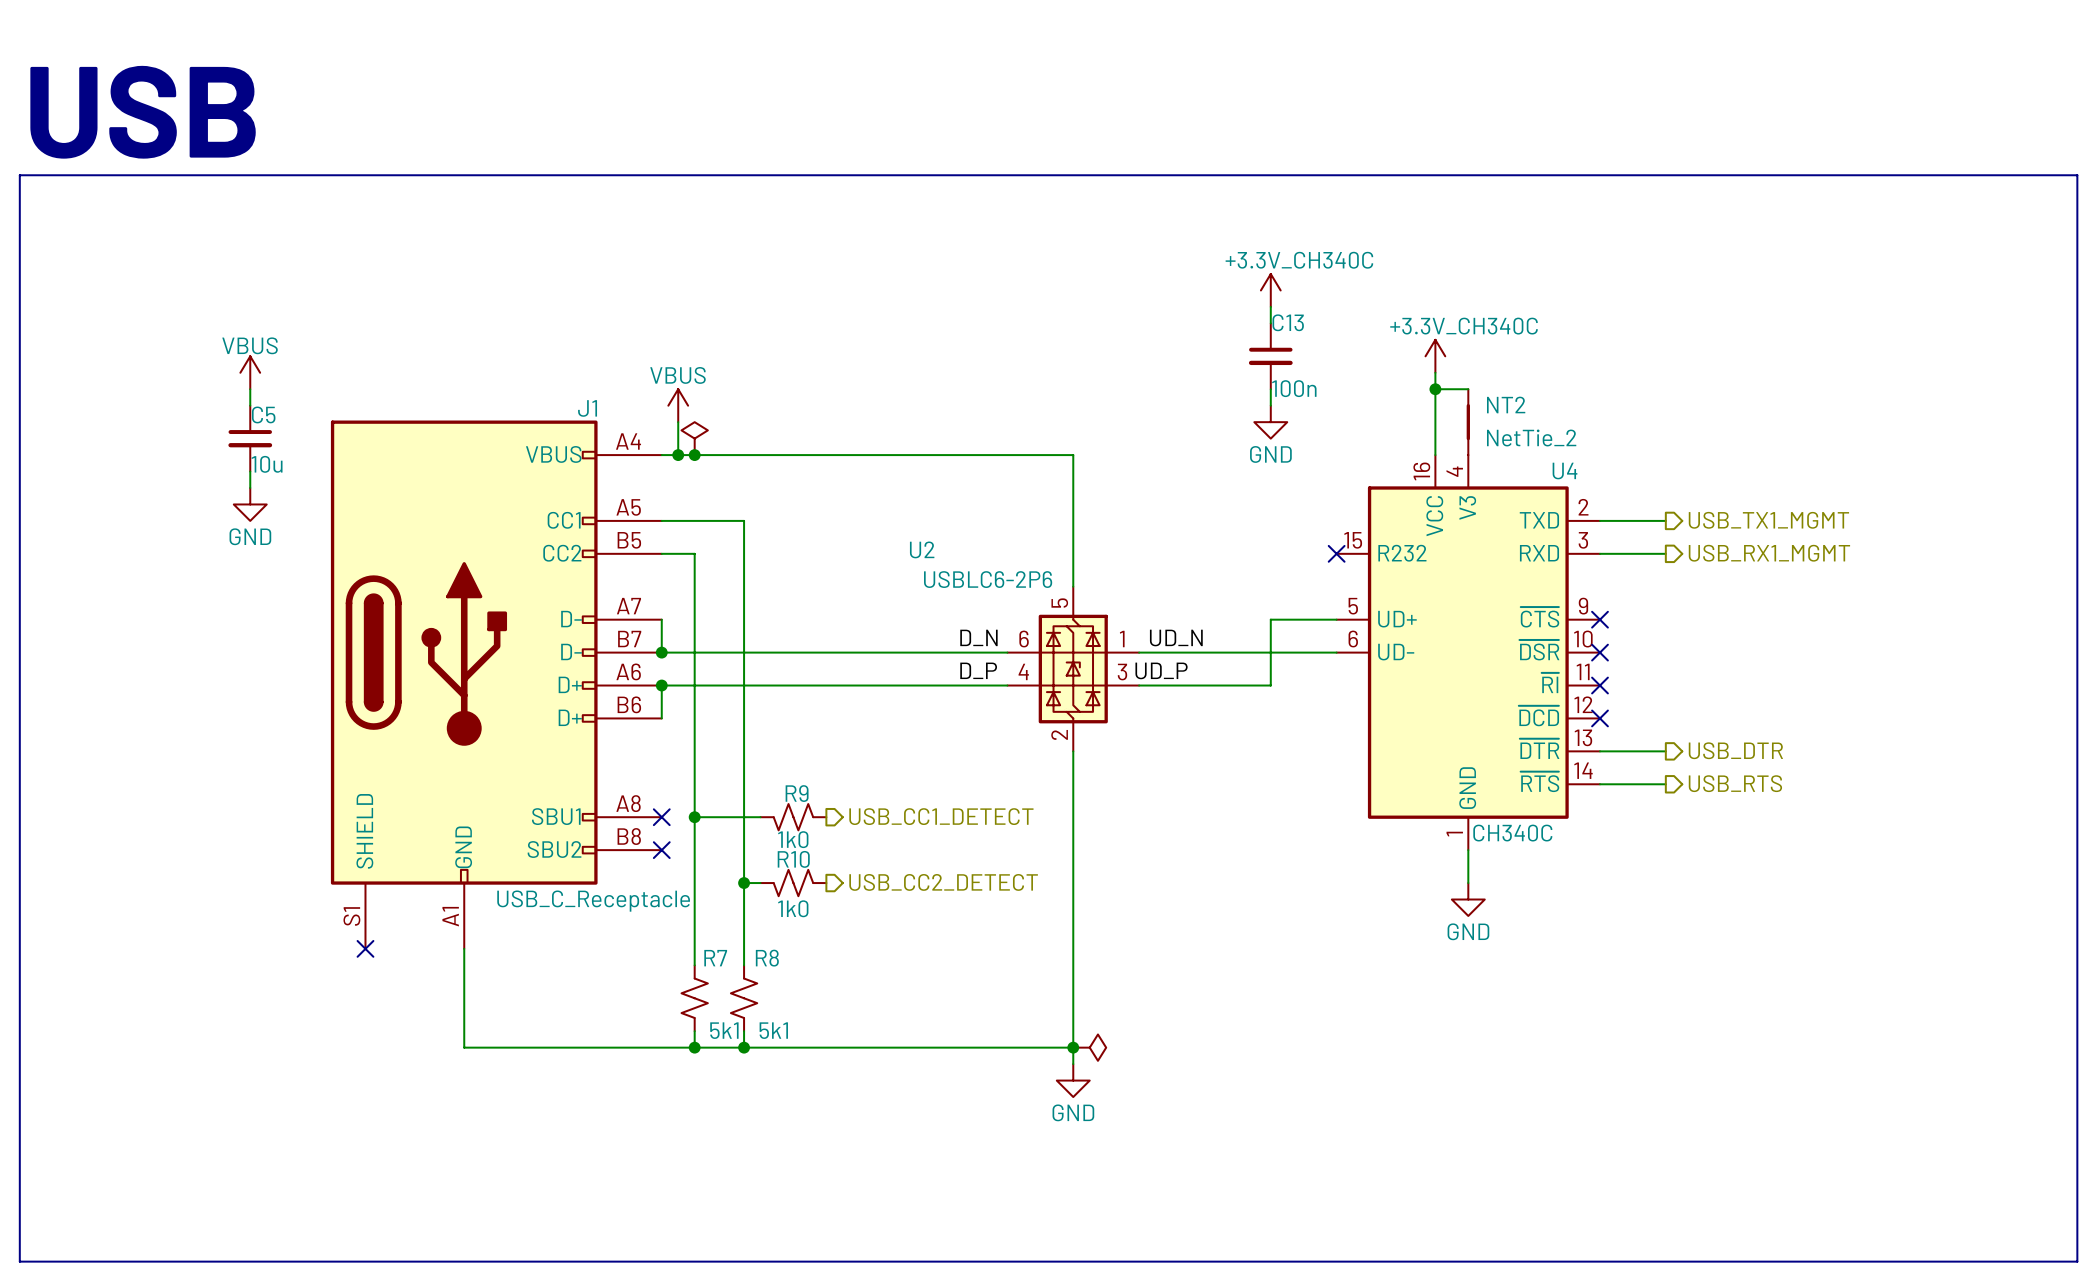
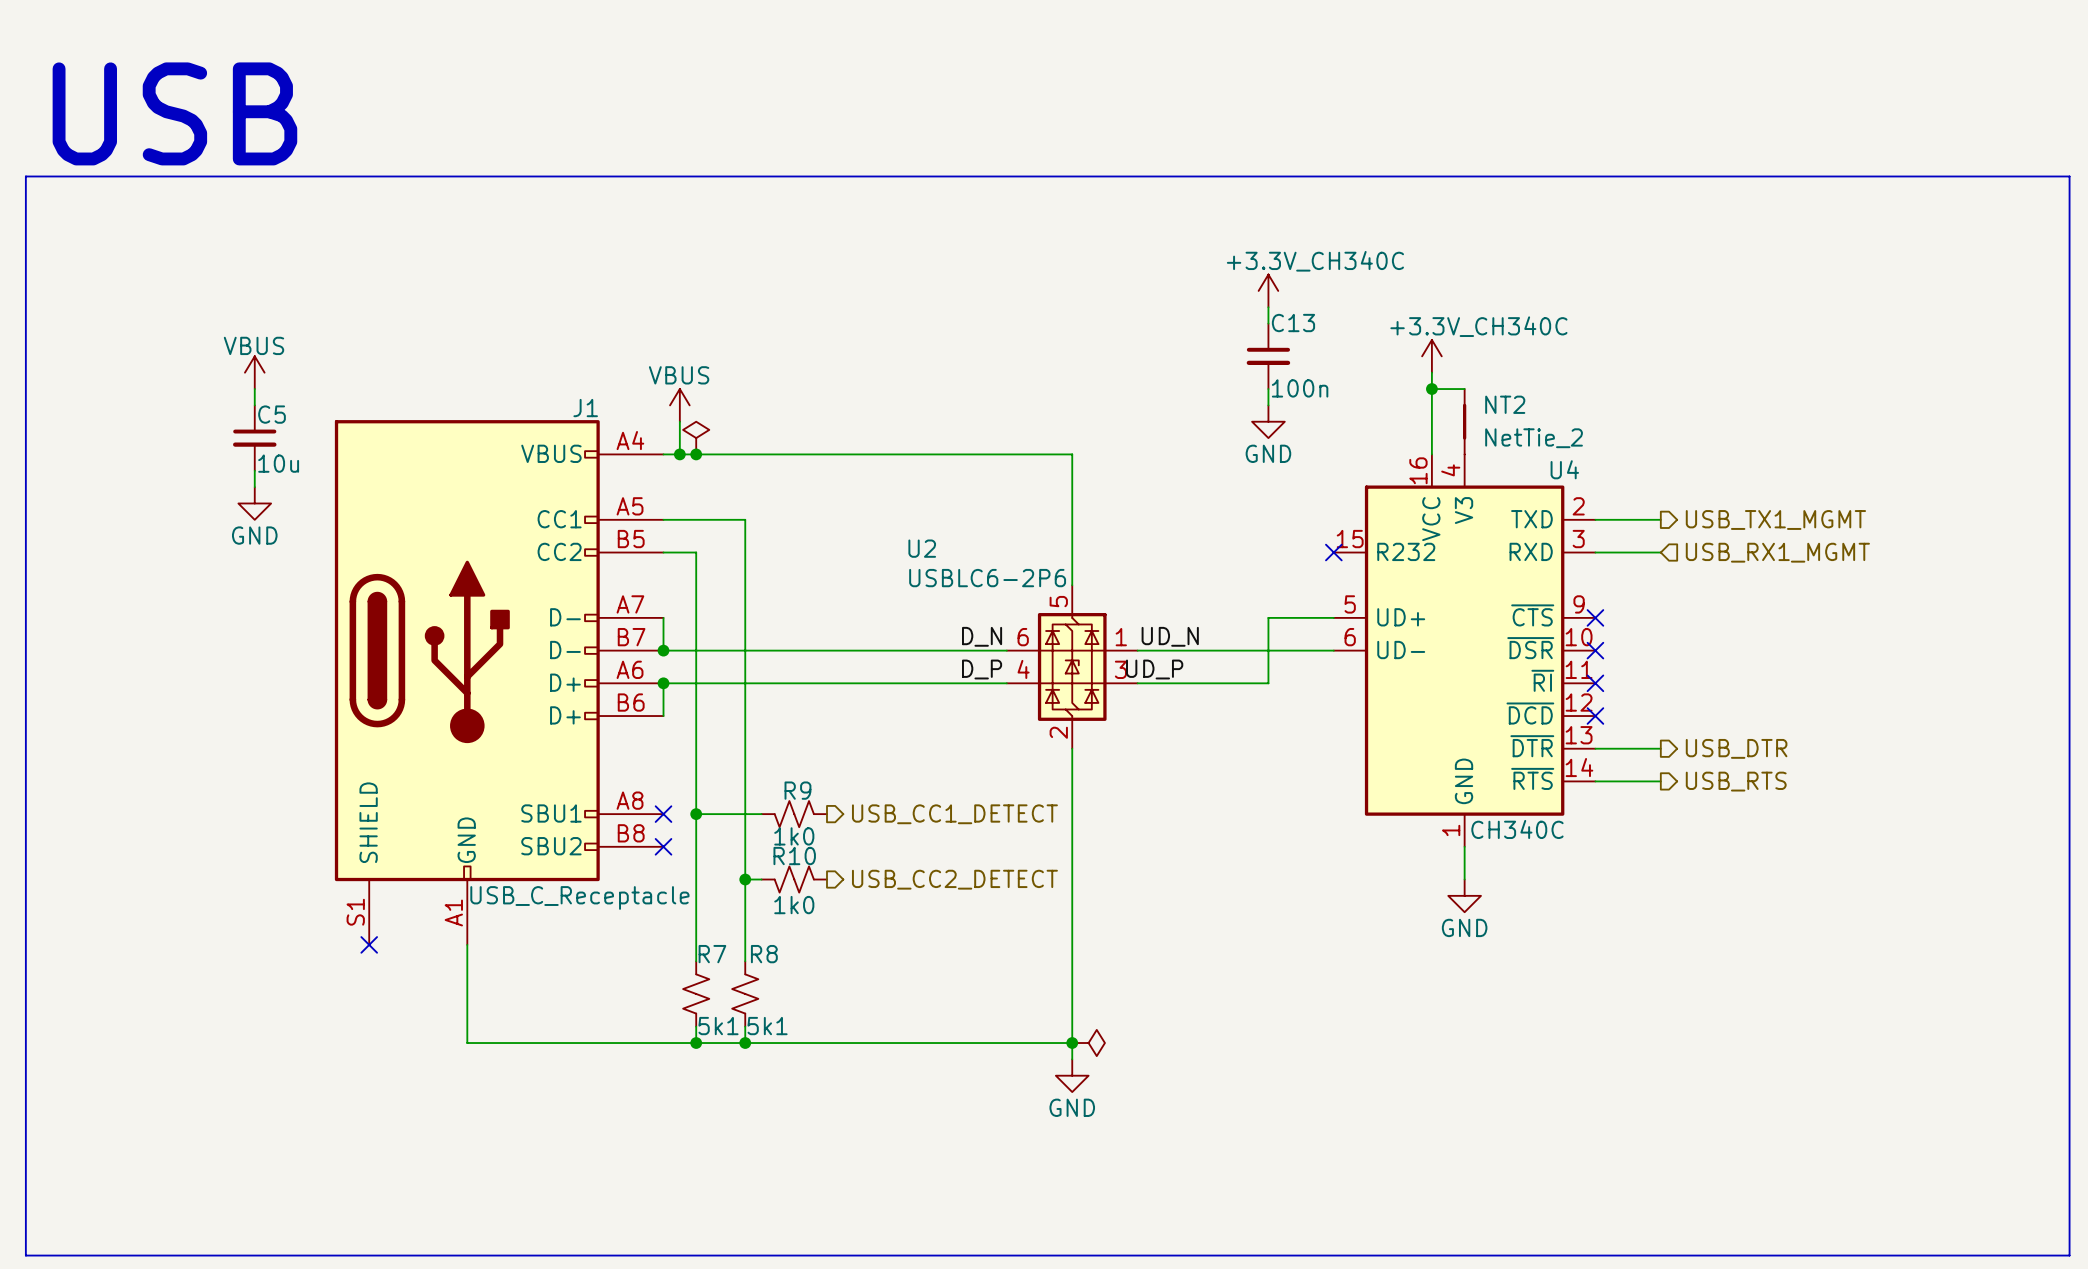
hierarchical label shape: output (1769, 553) -> input (1777, 552)

